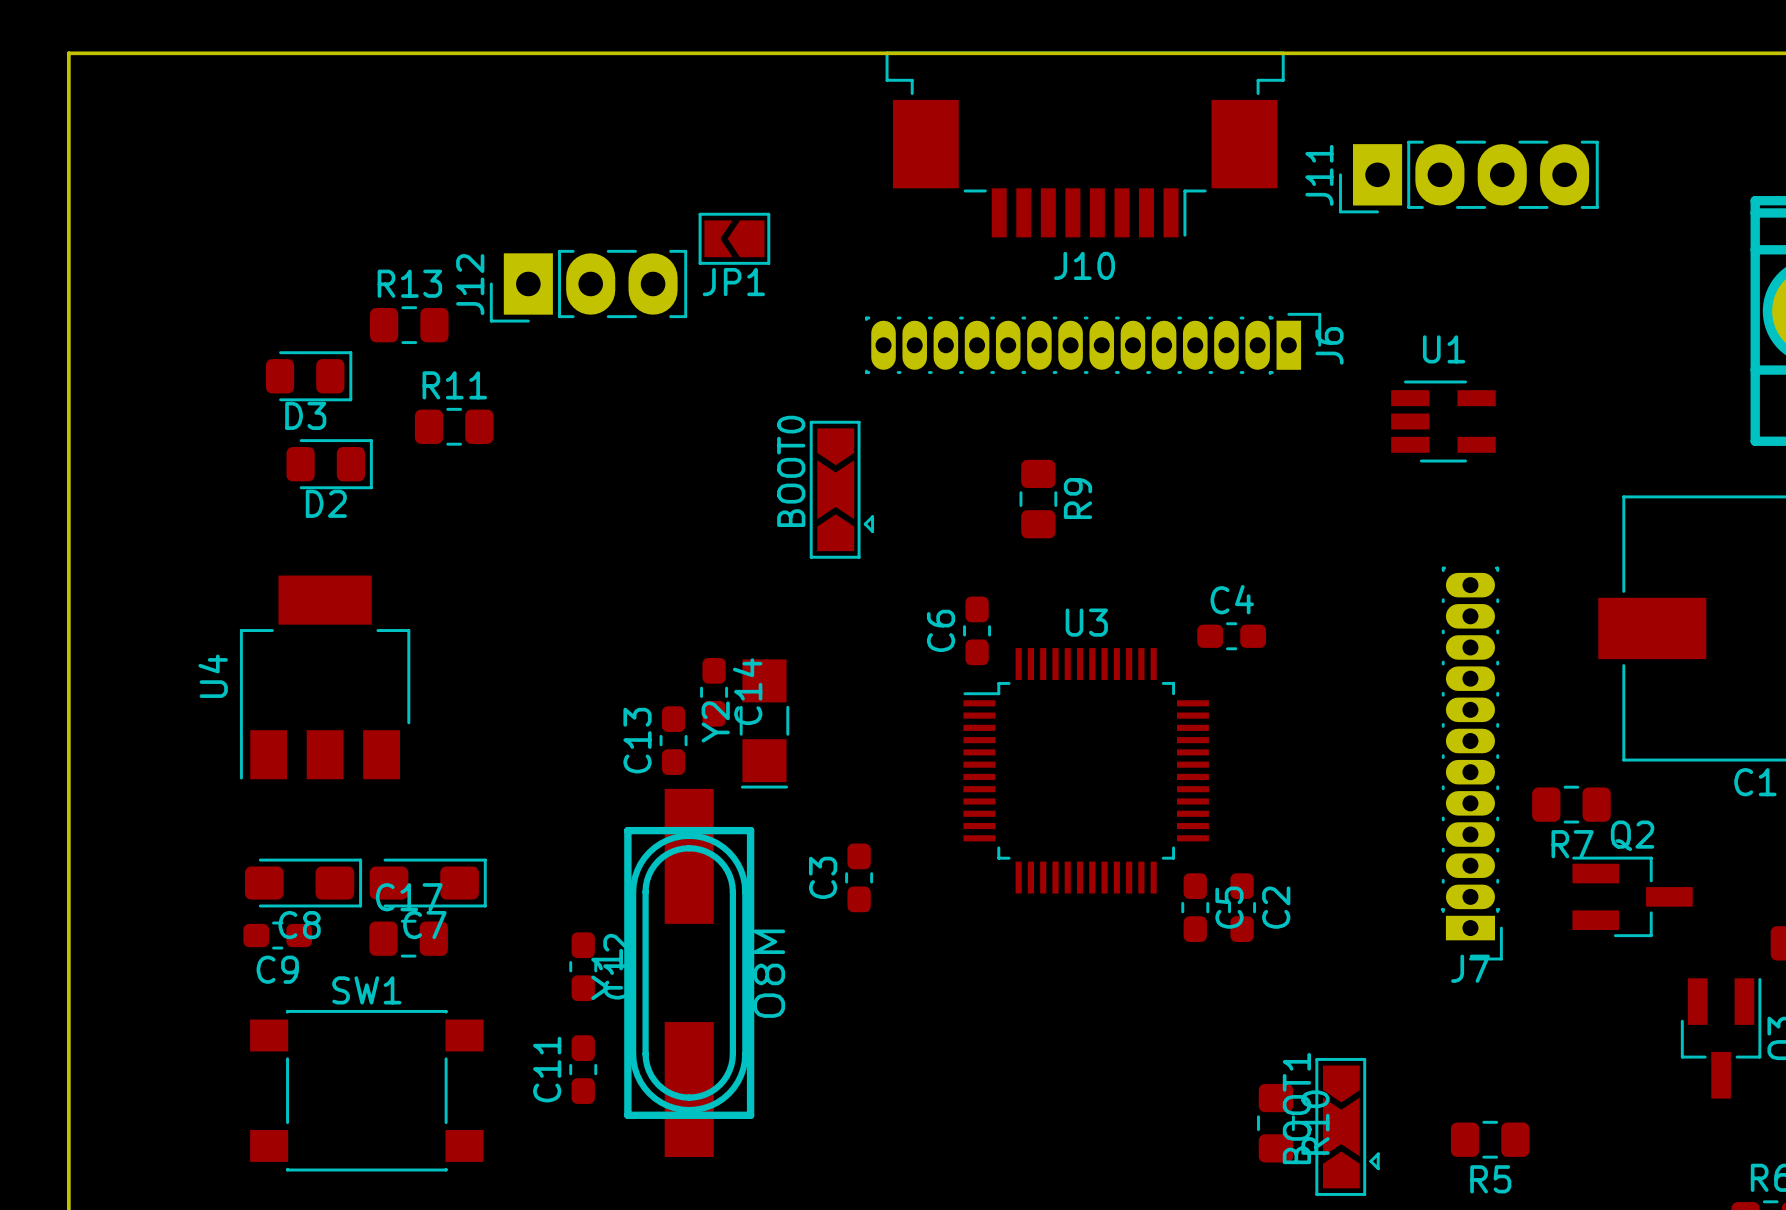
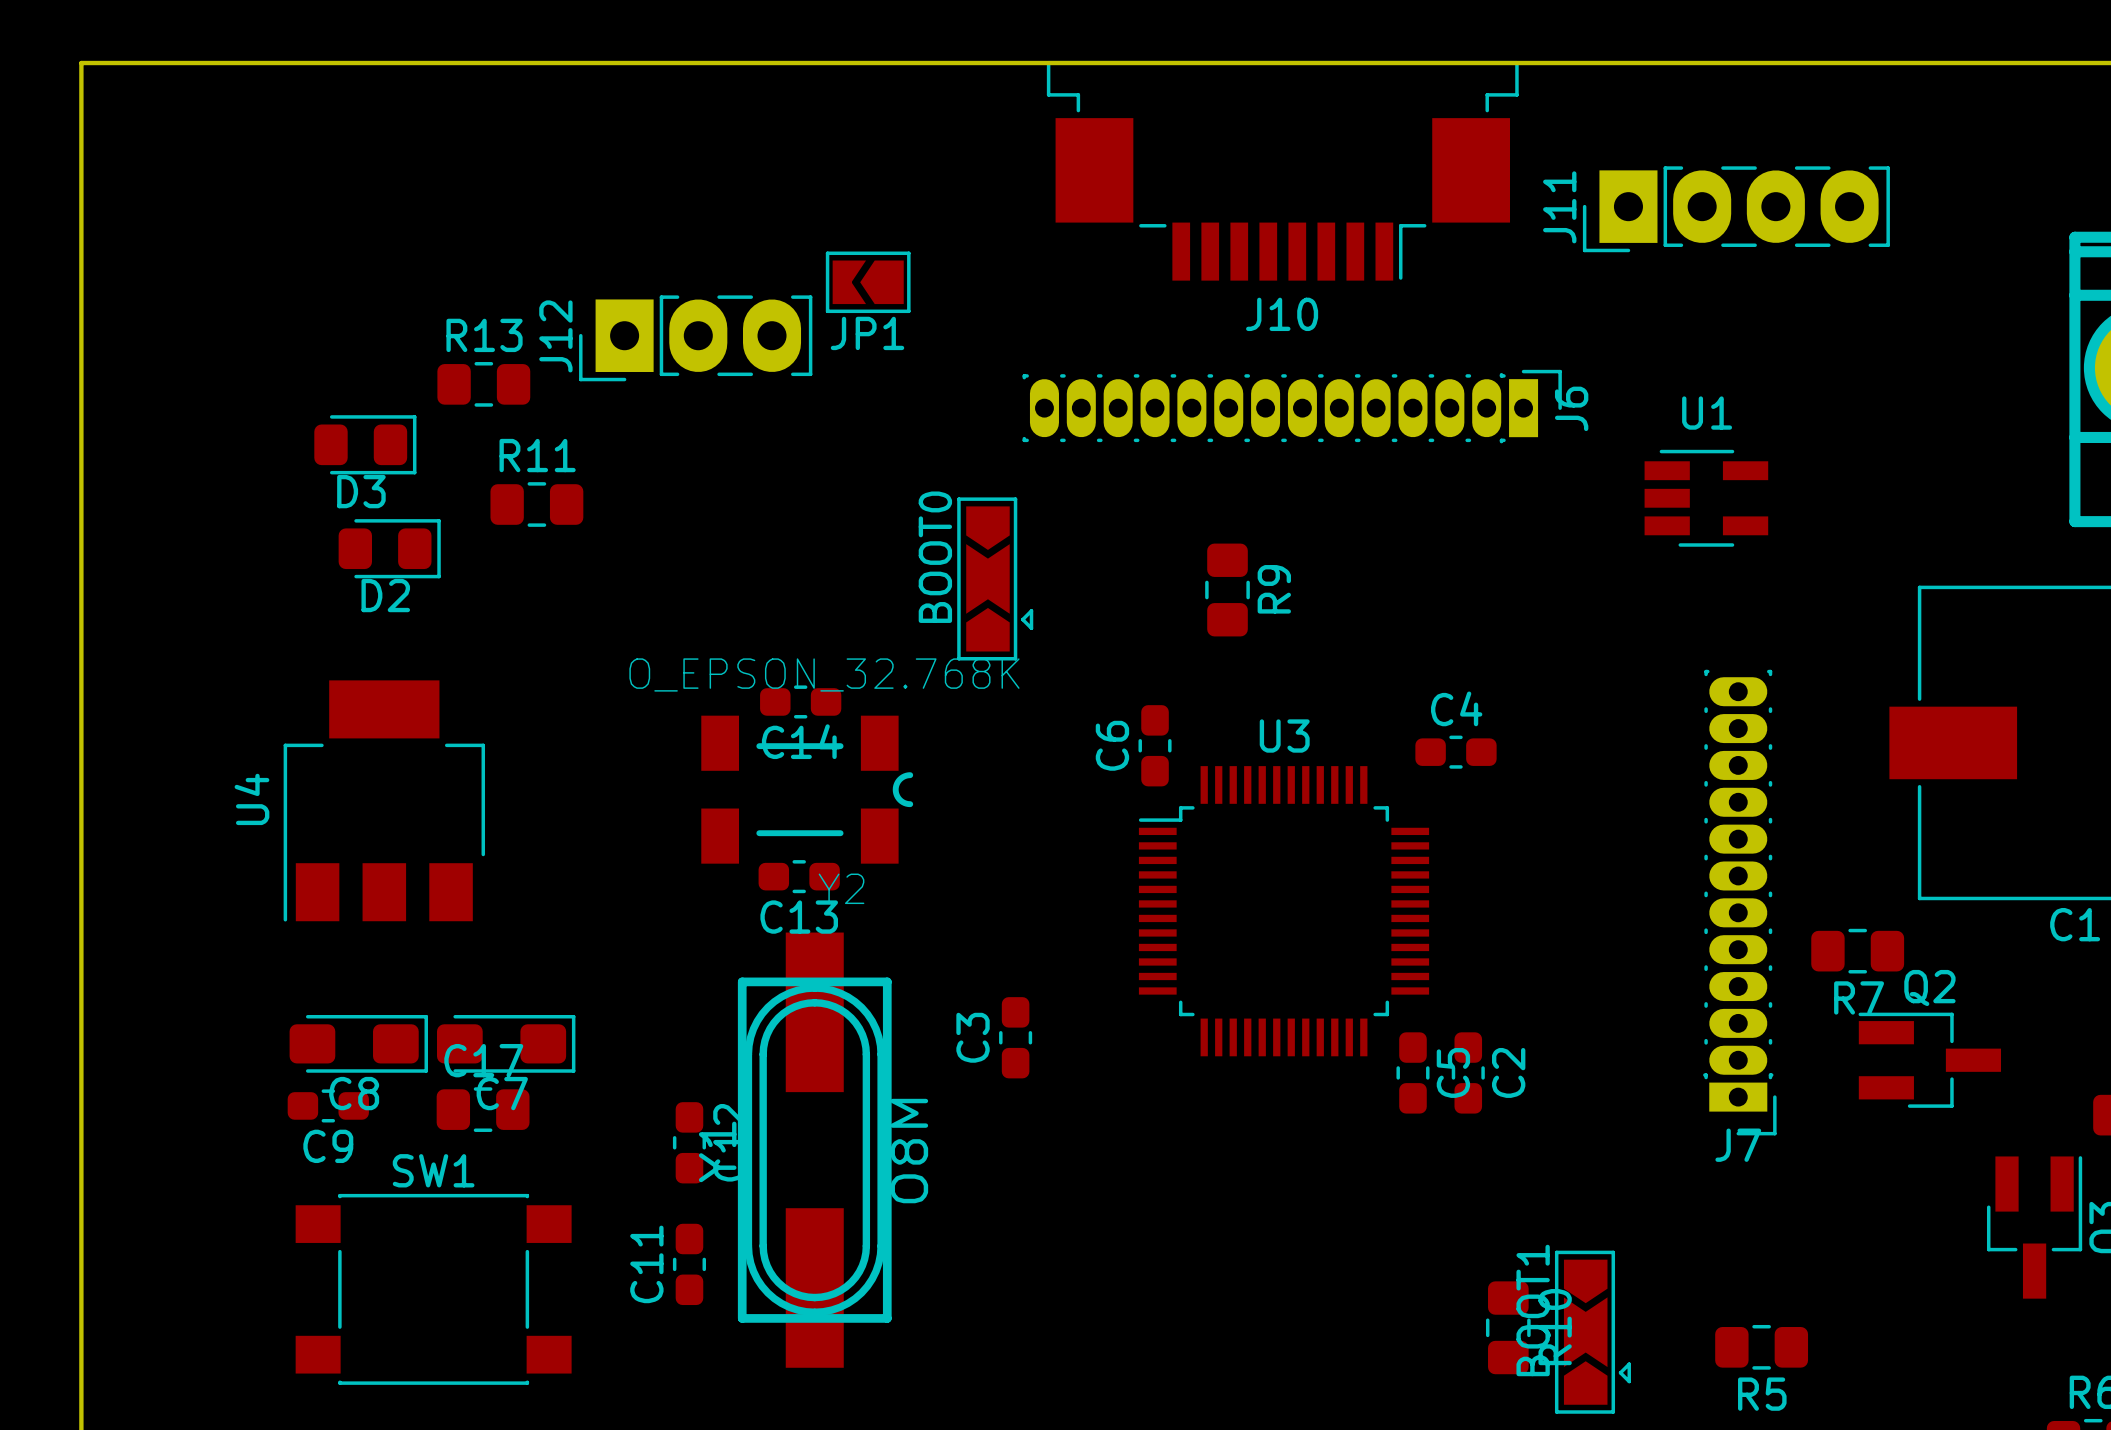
Y2 value: none -> O_EPSON_32.768K (824, 674)
Y2 footprint: [739, 659, 790, 789] -> [701, 715, 914, 864]
C14 rotation: 0° (714, 692) -> 90° clockwise (800, 701)
C14 position: (714, 692) -> (800, 701)
Y2 name position: Y2 (715, 721) -> Y2 (841, 888)
C13 name position: C13 (637, 740) -> C13 (799, 917)
C13 rotation: 0° (673, 740) -> 90° clockwise (799, 876)

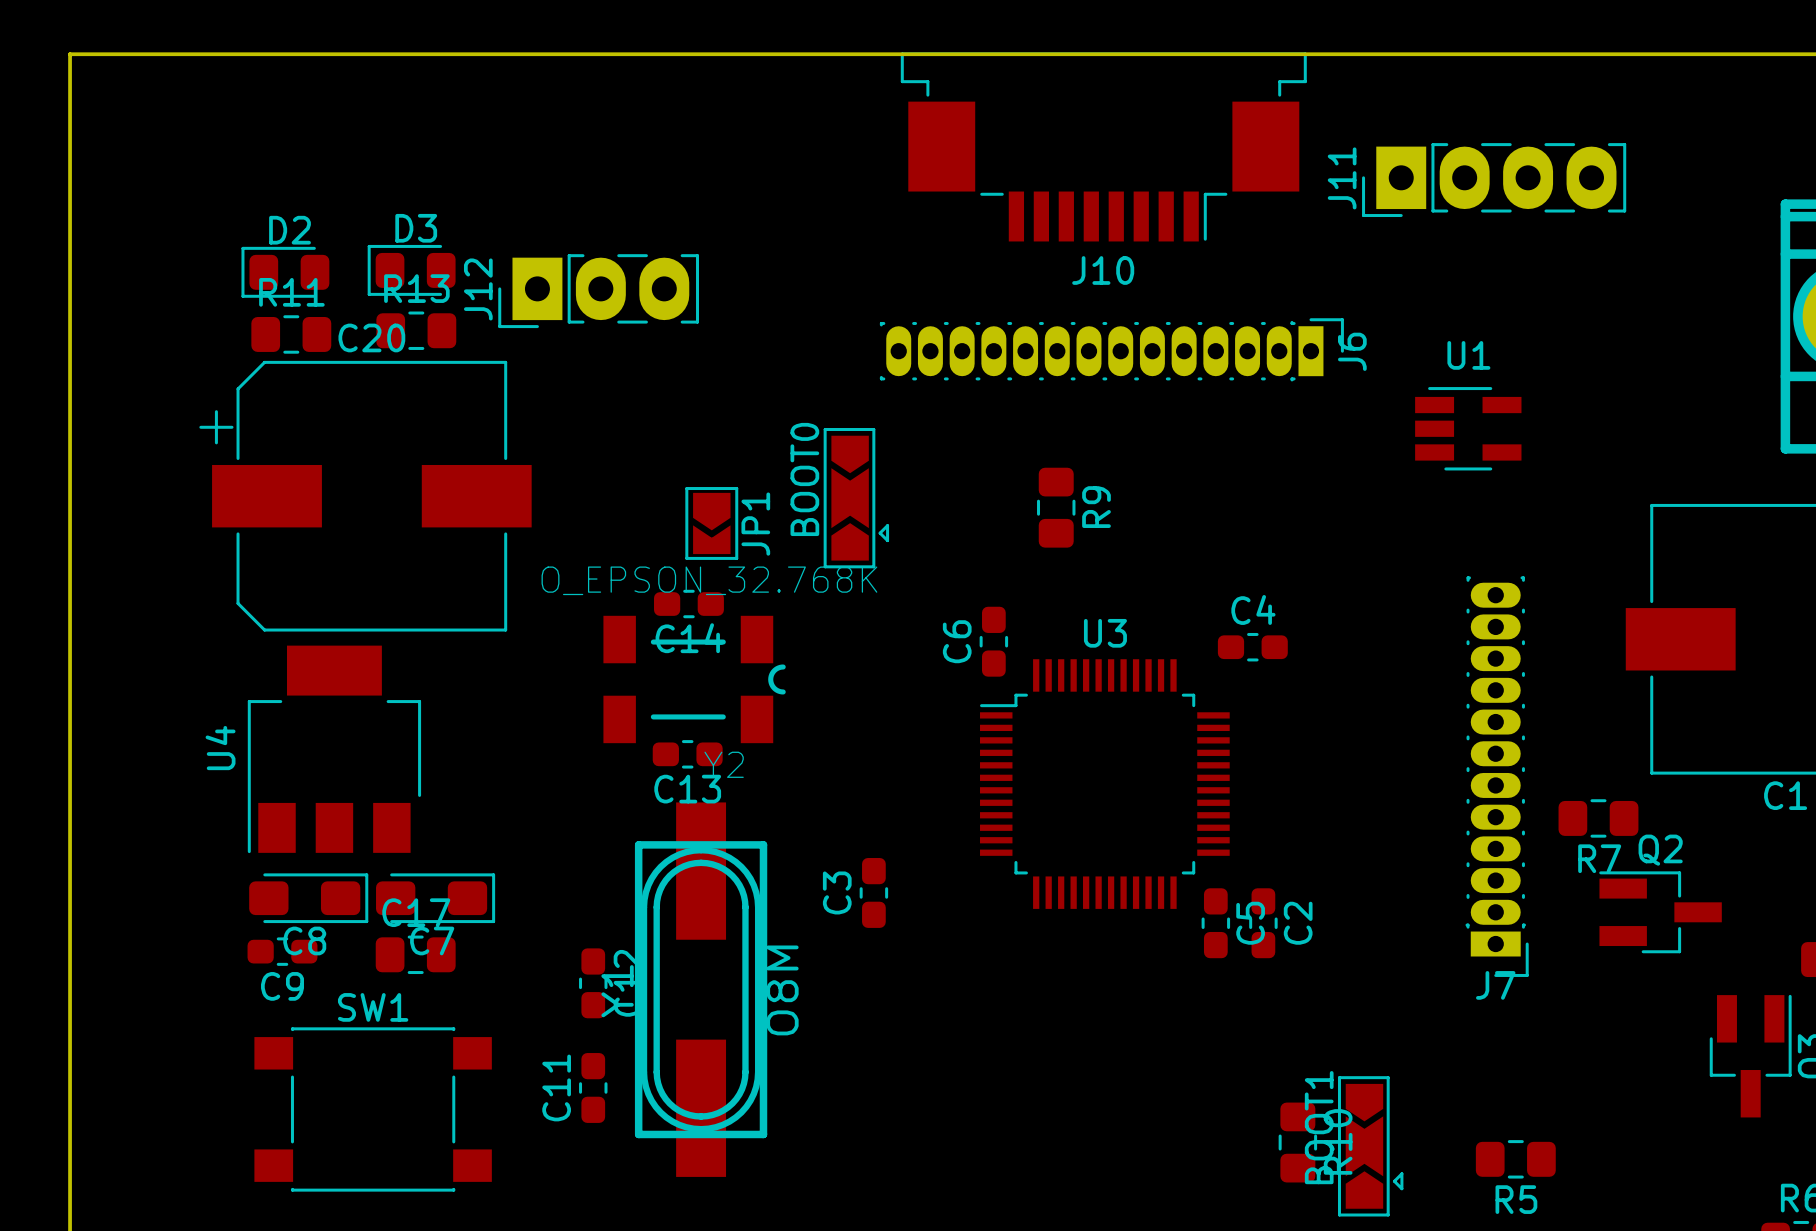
JP1 rotation: 0° (868, 282) -> 90° counterclockwise (711, 523)
JP1 position: (868, 282) -> (711, 523)
D3 rotation: 0° (365, 444) -> 180° (411, 270)
D3 position: (365, 444) -> (411, 270)
R11 position: (536, 504) -> (291, 334)
D2 rotation: 0° (389, 548) -> 180° (285, 272)
D2 position: (389, 548) -> (285, 272)
C20: none -> (365, 496)
U4 position: (384, 800) -> (334, 749)

